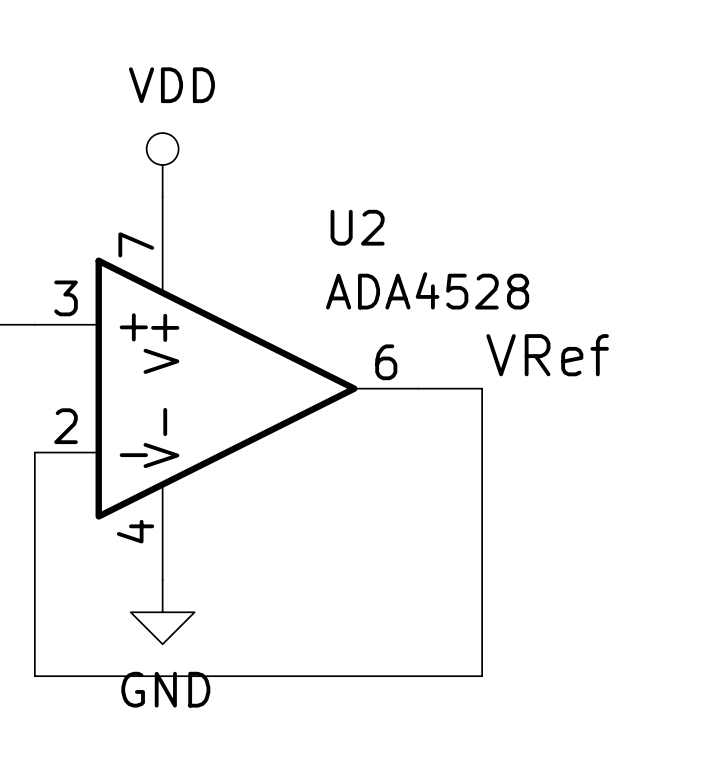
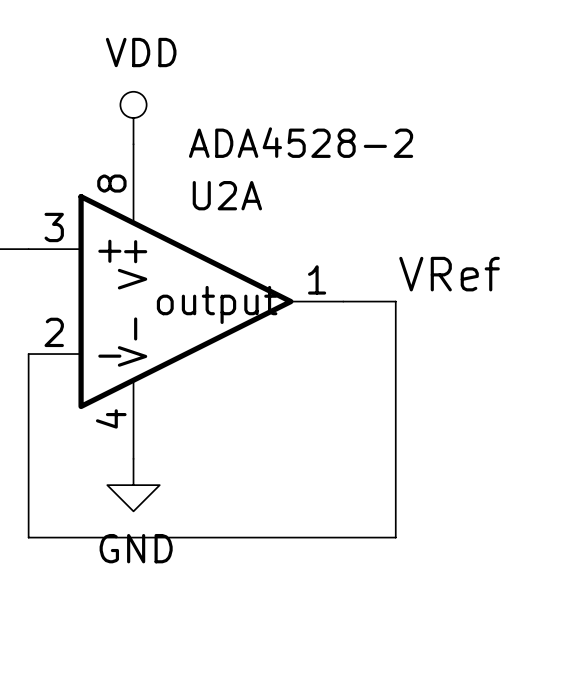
U2 name: U2 (357, 227) -> U2A (227, 195)
U2 pin number: 7 (136, 244) -> 8 (111, 183)
U2 value: ADA4528 (427, 290) -> ADA4528-2 (301, 142)
U2 pin number: 6 (386, 362) -> 1 (317, 279)
U2 pin name: none -> output (217, 304)

